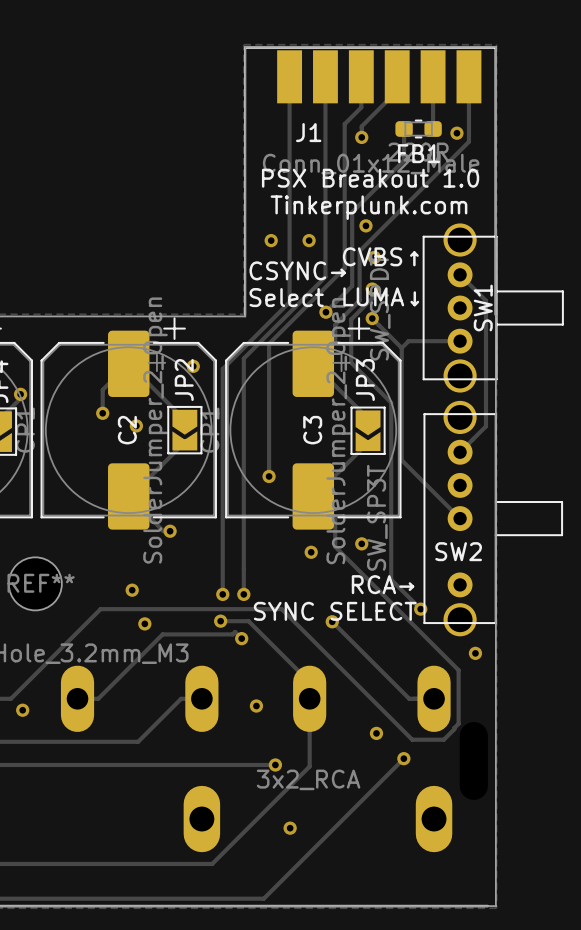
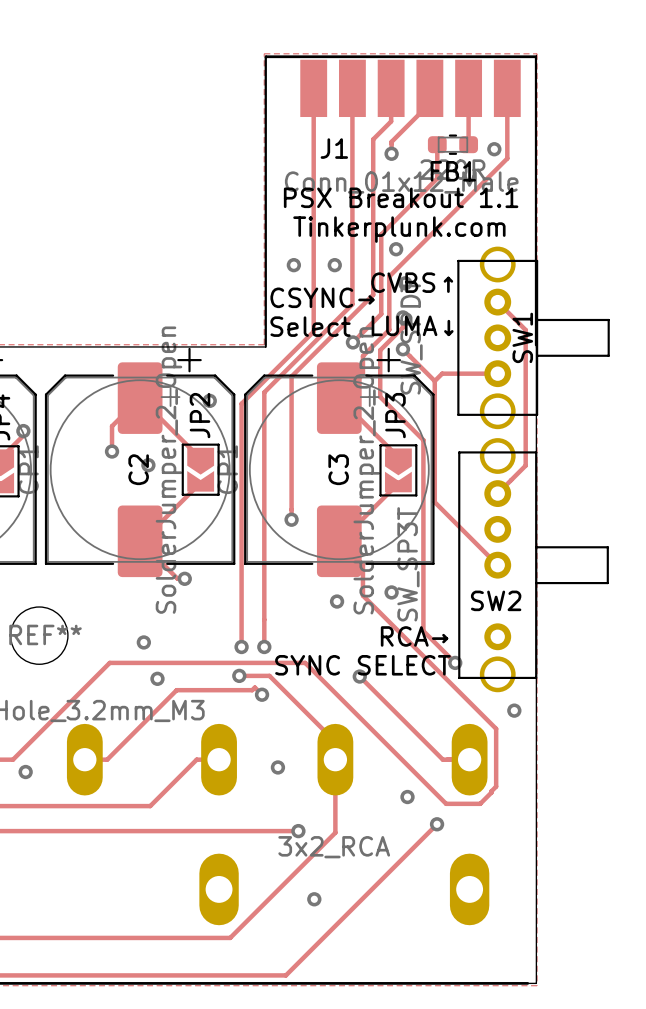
text: PSX Breakout 1.0 (370, 178) -> PSX Breakout 1.1 (401, 197)

